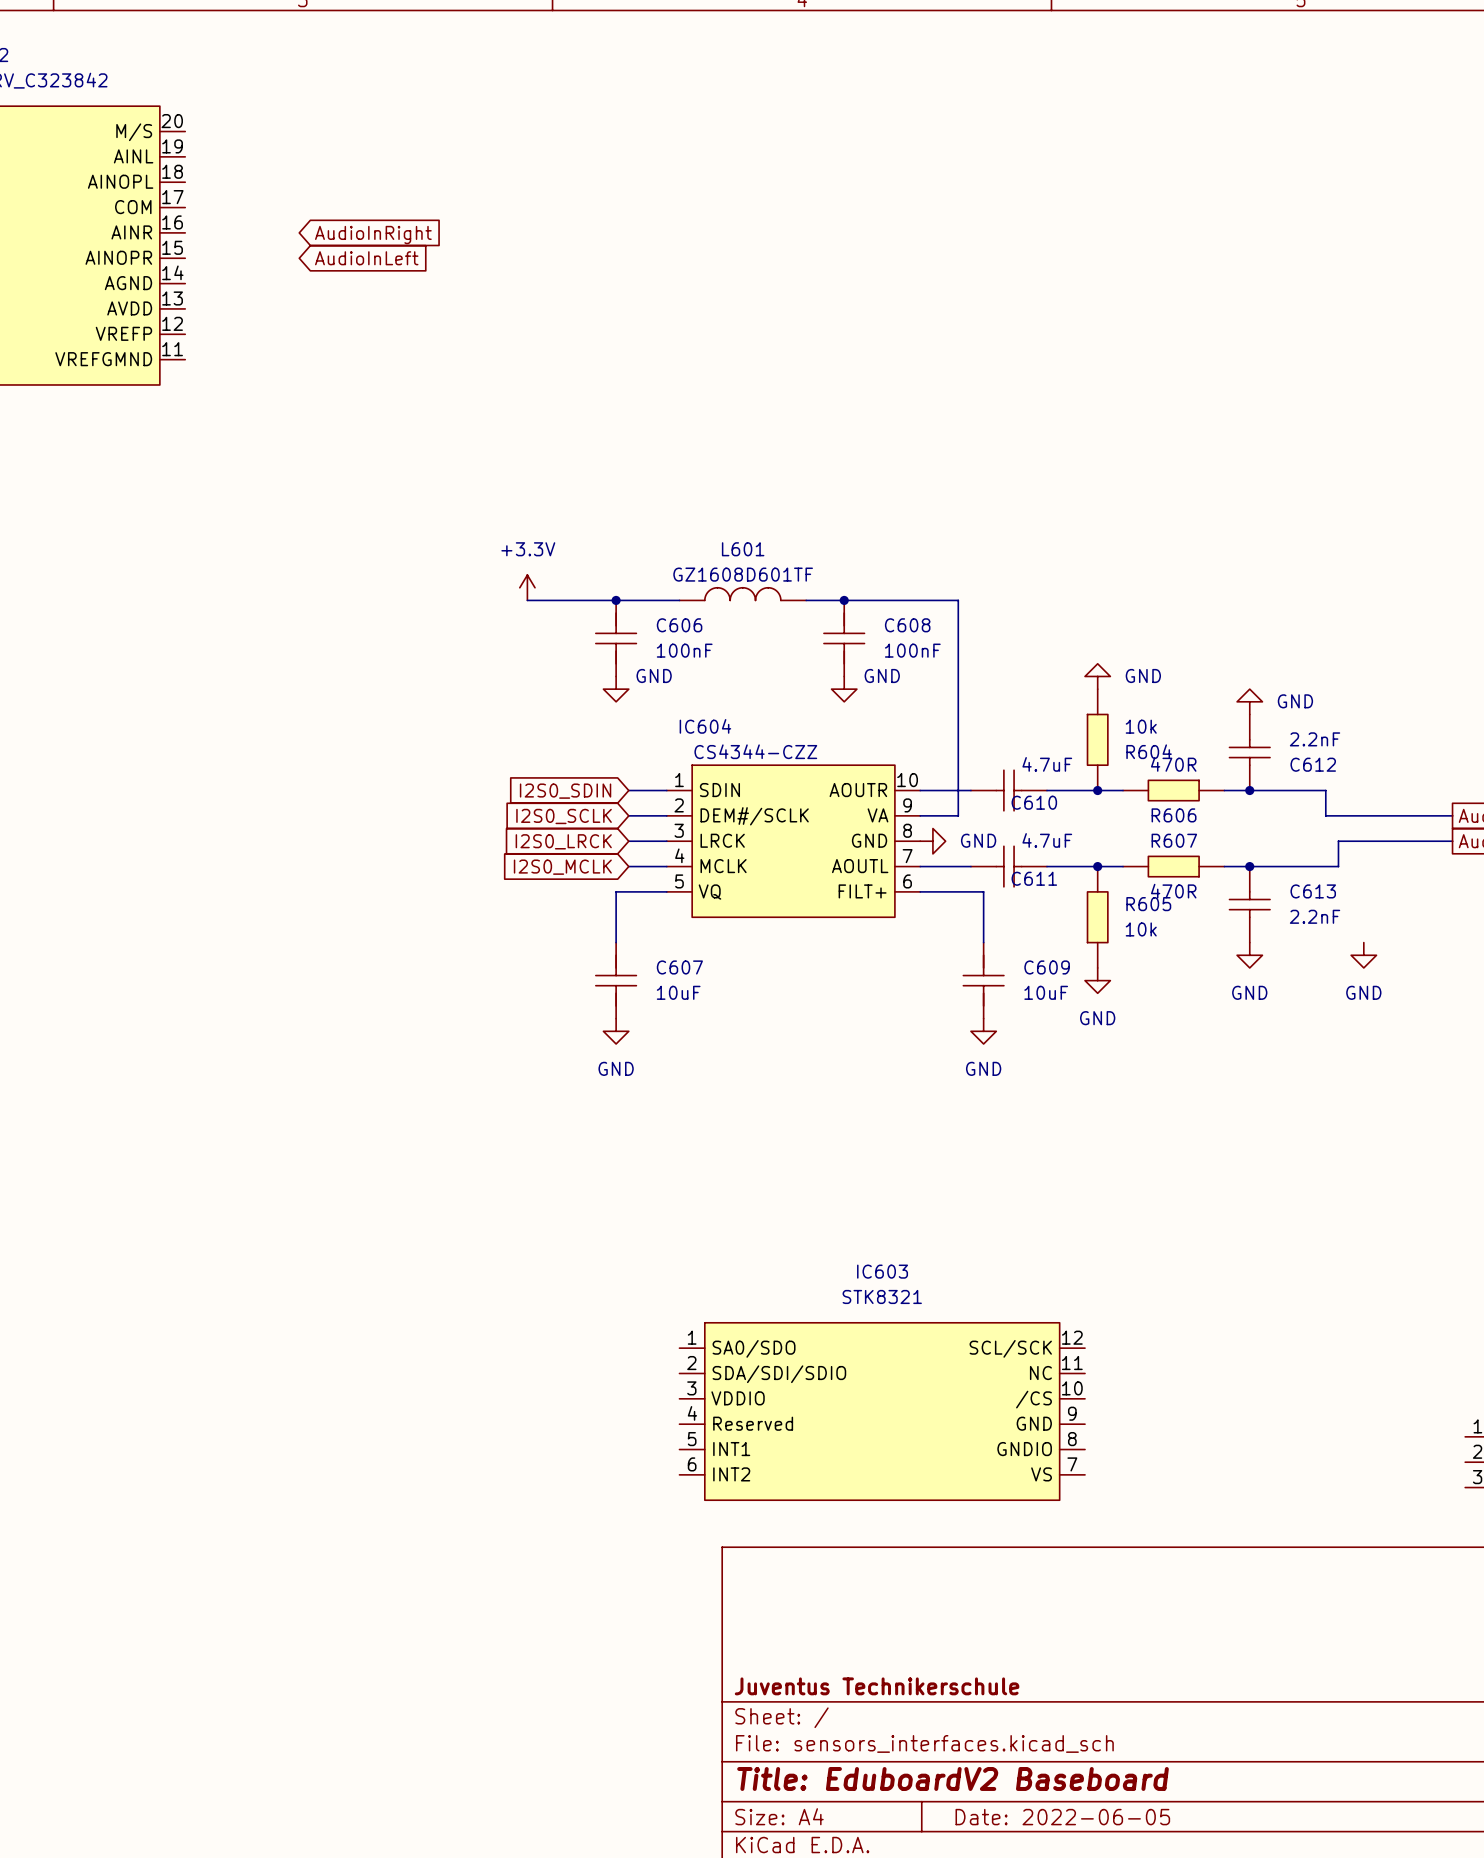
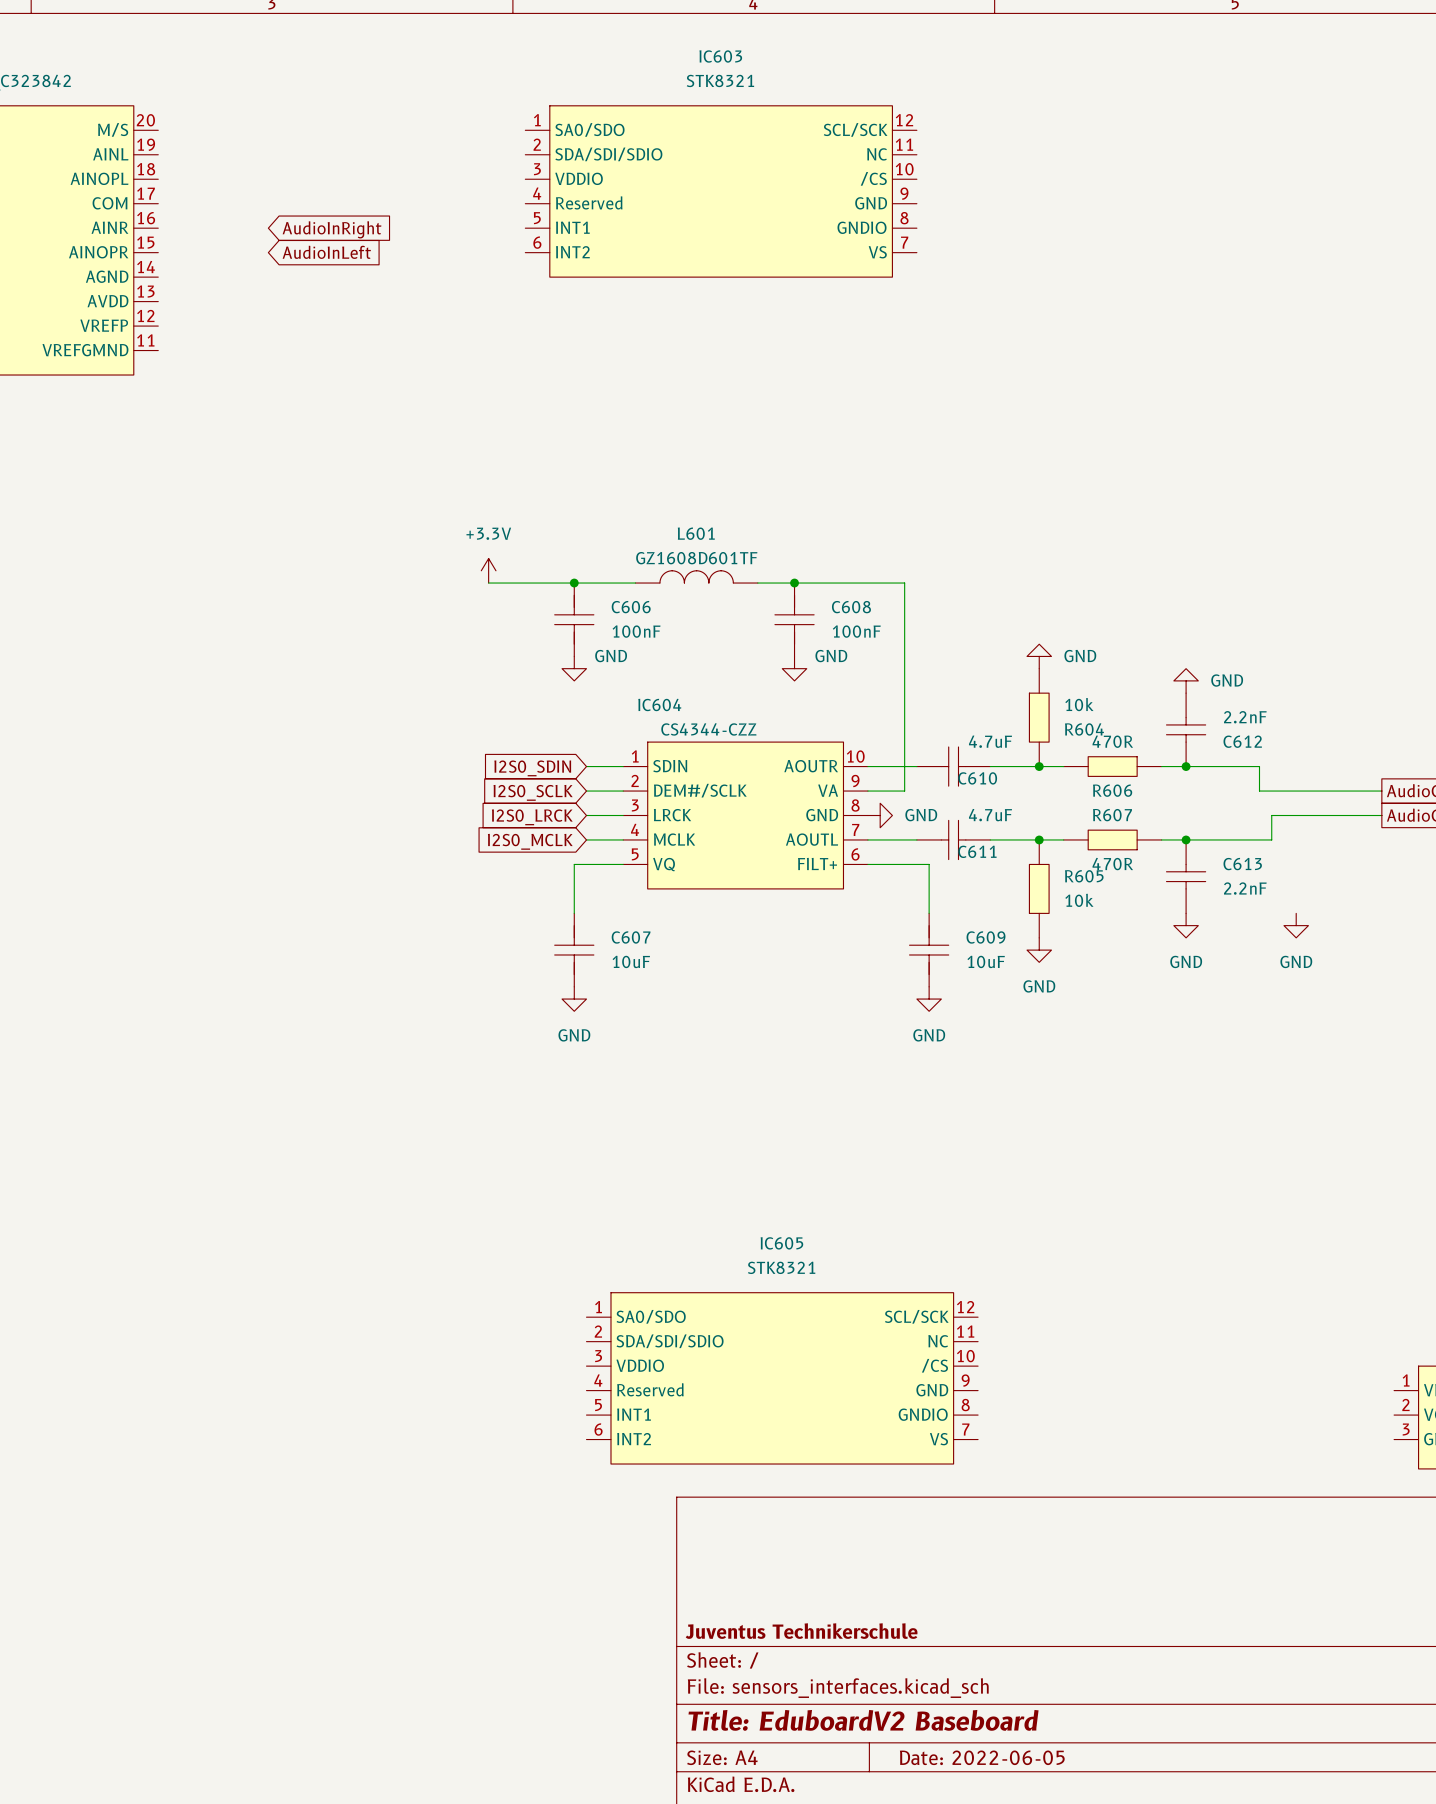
IC603 position: (882, 1411) -> (721, 191)
IC605: none -> STK8321 (782, 1378)

